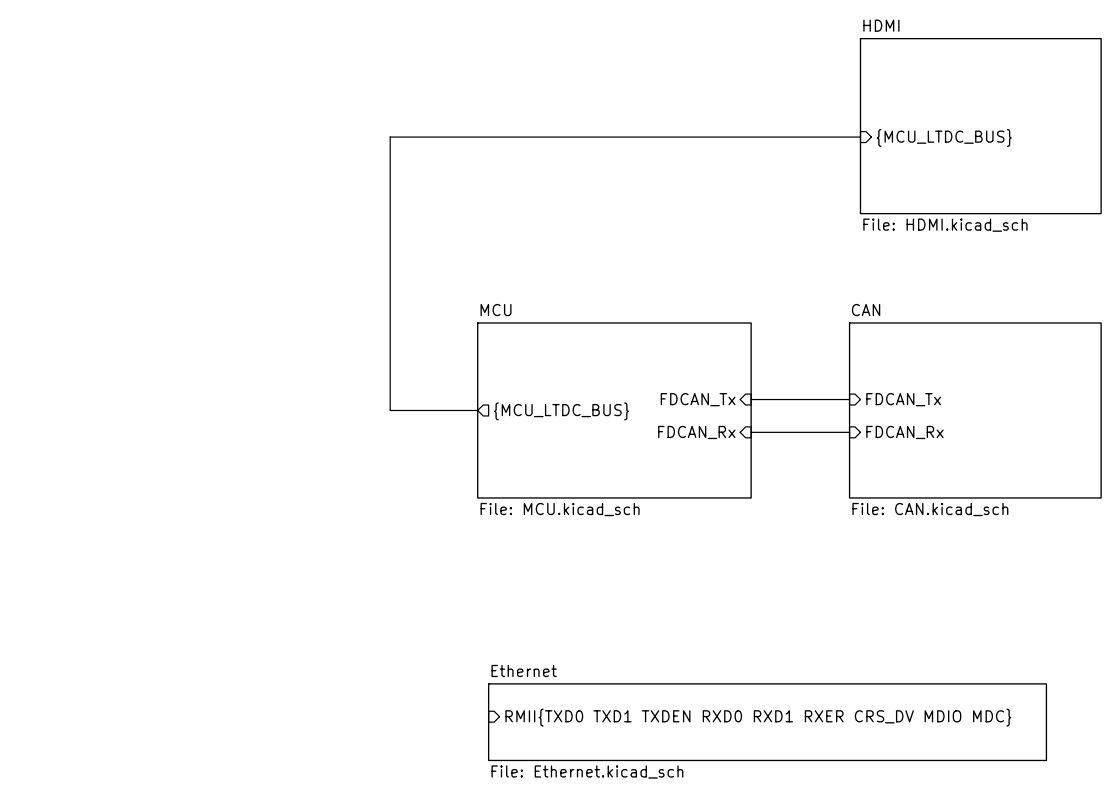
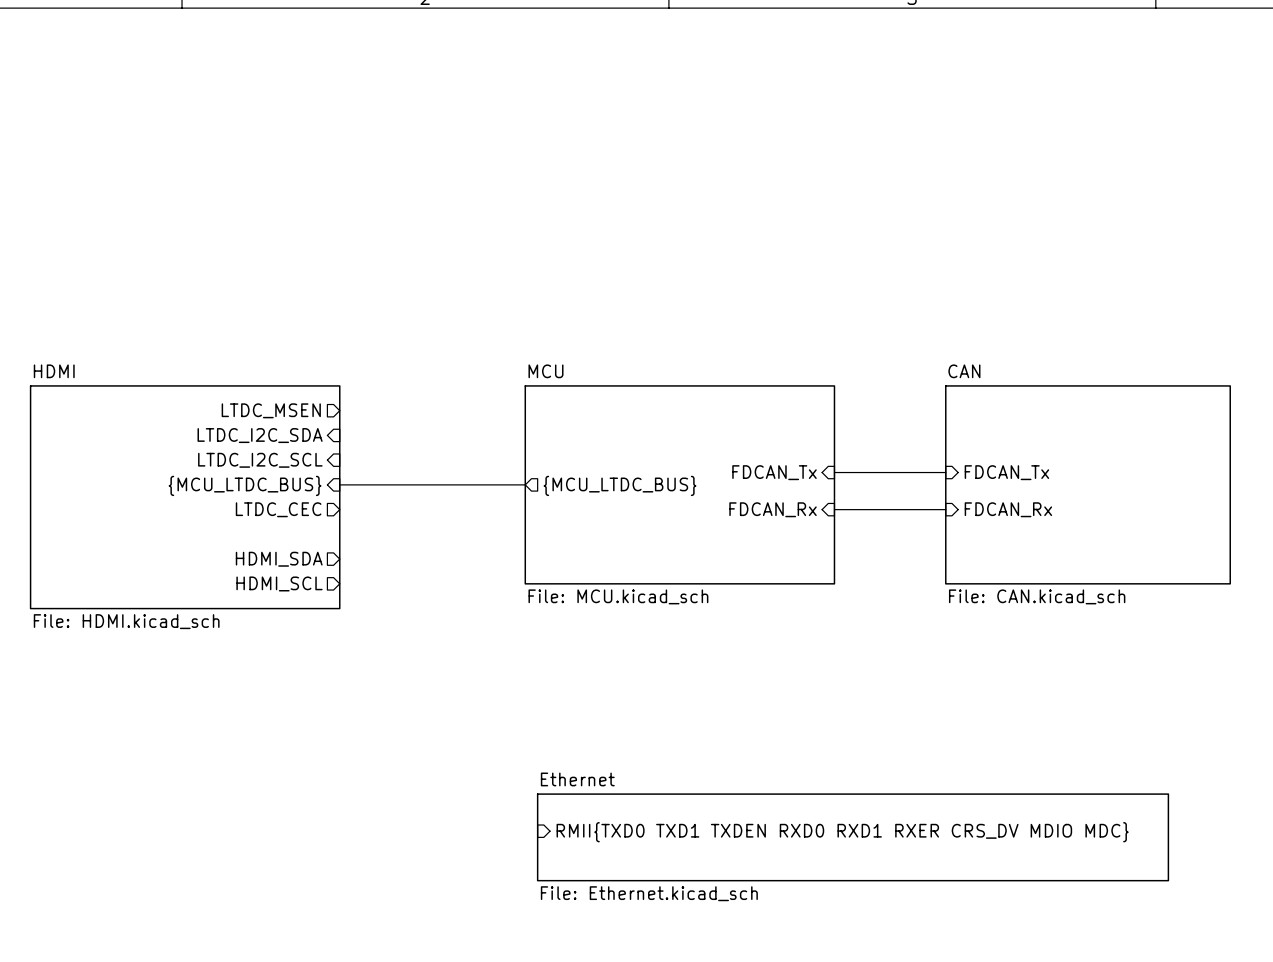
sheet HDMI: File: HDMI.kicad_sch (980, 126) -> none
bus: (860, 137) (390, 137) (390, 410) -> (339, 484) (426, 484)
sheet pin: {MCU_LTDC_BUS} (944, 137) -> none
sheet pin: none -> LTDC_MSEN (271, 410)
sheet pin: none -> LTDC_I2C_SDA (260, 435)
sheet pin: none -> LTDC_I2C_SCL (260, 460)
sheet pin: none -> {MCU_LTDC_BUS} (245, 485)
sheet HDMI: none -> File: HDMI.kicad_sch (185, 497)
sheet pin: none -> LTDC_CEC (278, 509)
sheet pin: none -> HDMI_SDA (279, 559)
sheet pin: none -> HDMI_SCL (279, 583)

